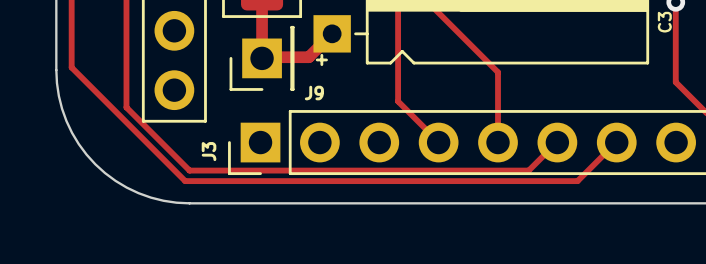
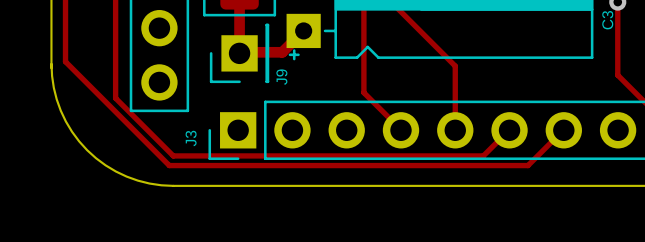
J9 name rotation: 0° (314, 93) -> 90° counterclockwise (281, 77)

